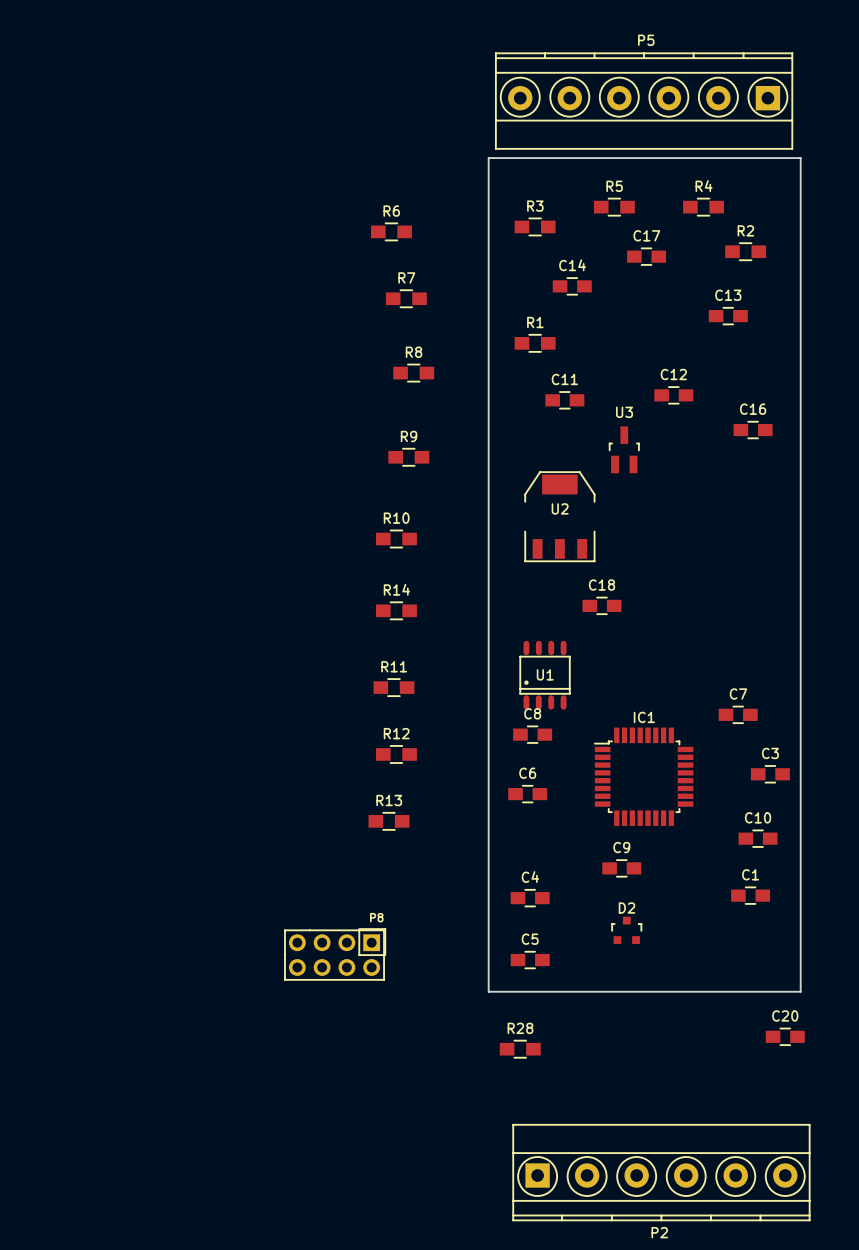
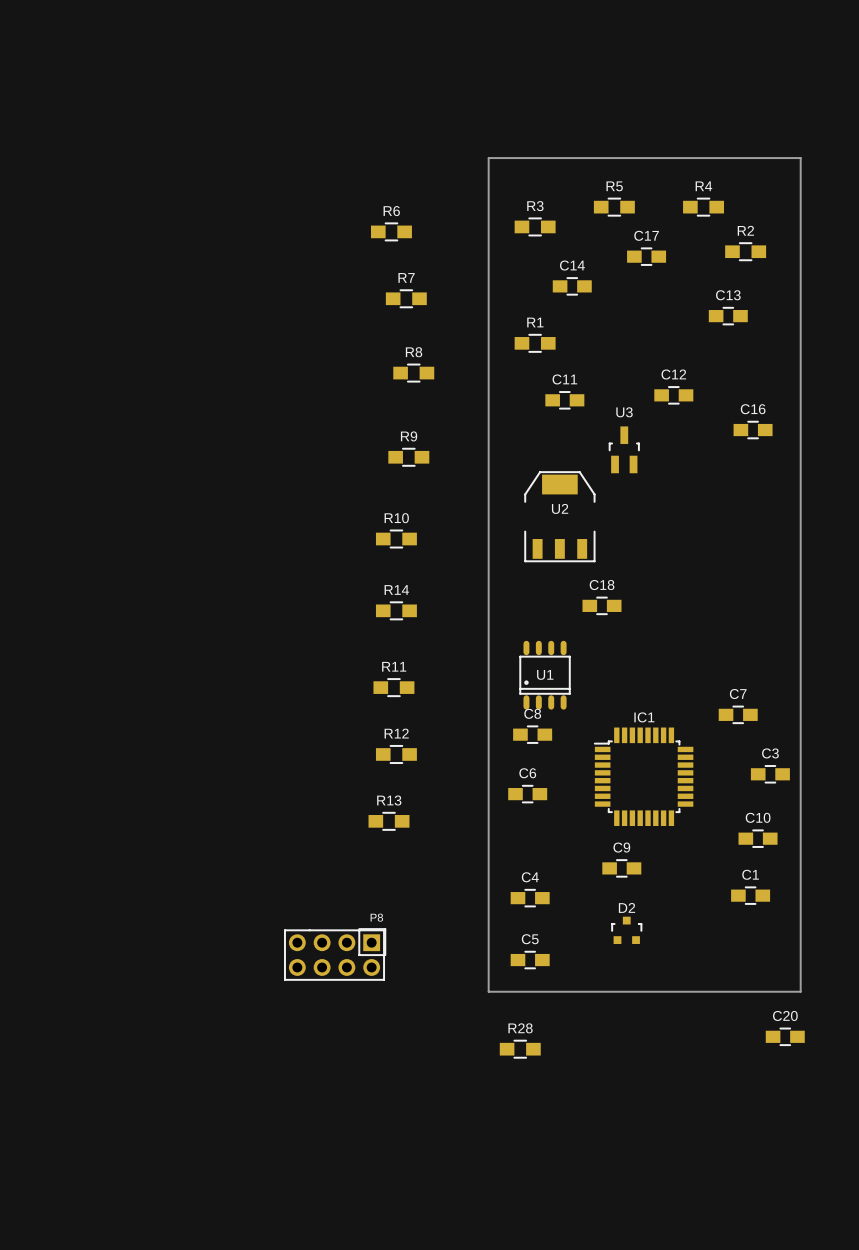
P5: (644, 101) -> none
P2: (661, 1172) -> none

